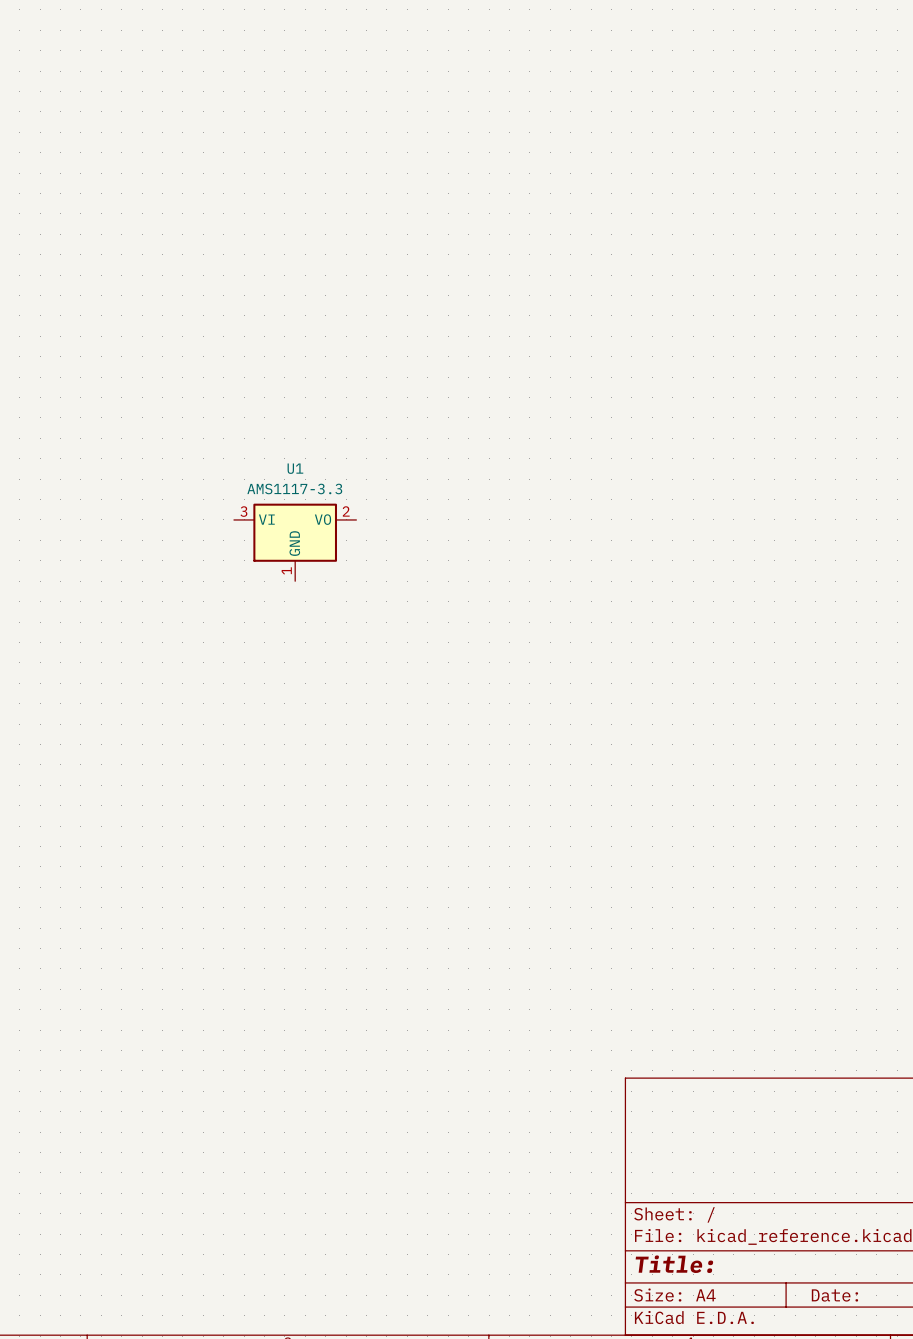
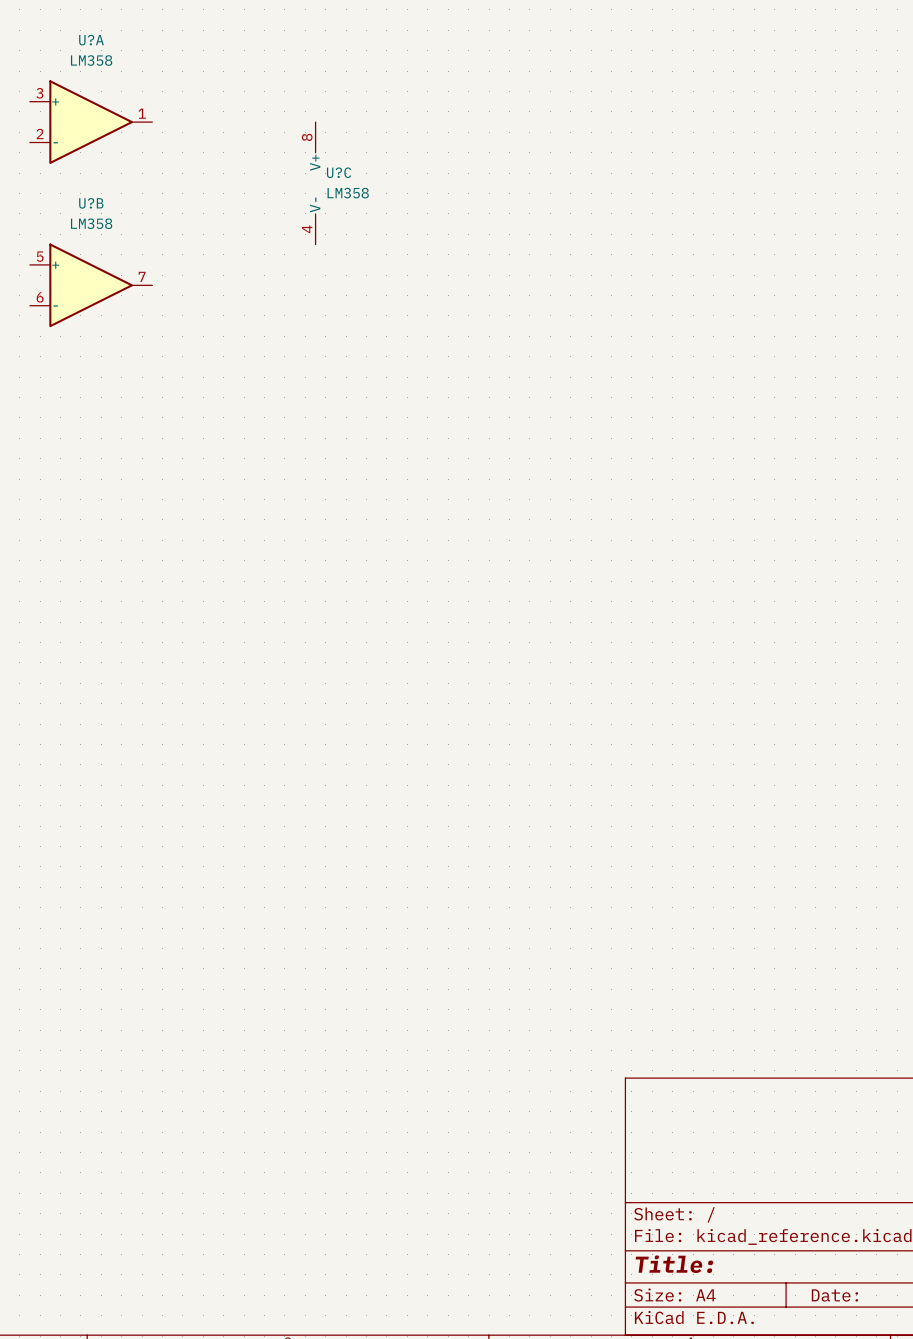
U?A: none -> LM358 (91, 122)
U?C: none -> LM358 (315, 183)
U?B: none -> LM358 (91, 285)
U1: AMS1117-3.3 (295, 542) -> none

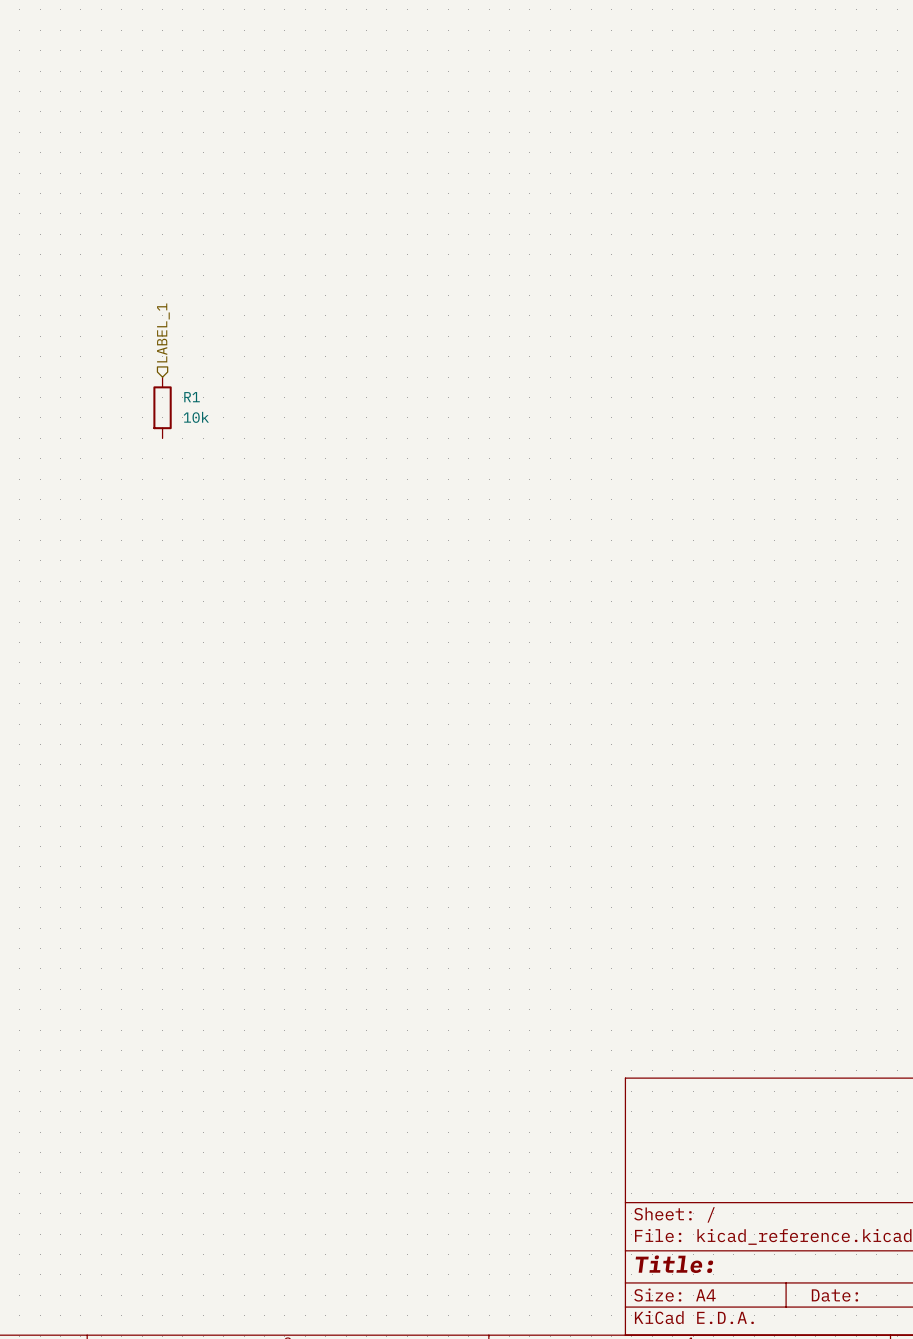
U?A: LM358 (91, 122) -> none
U?C: LM358 (315, 183) -> none
U?B: LM358 (91, 285) -> none
hierarchical label: none -> LABEL_1 (163, 332)
R1: none -> 10k (162, 407)

